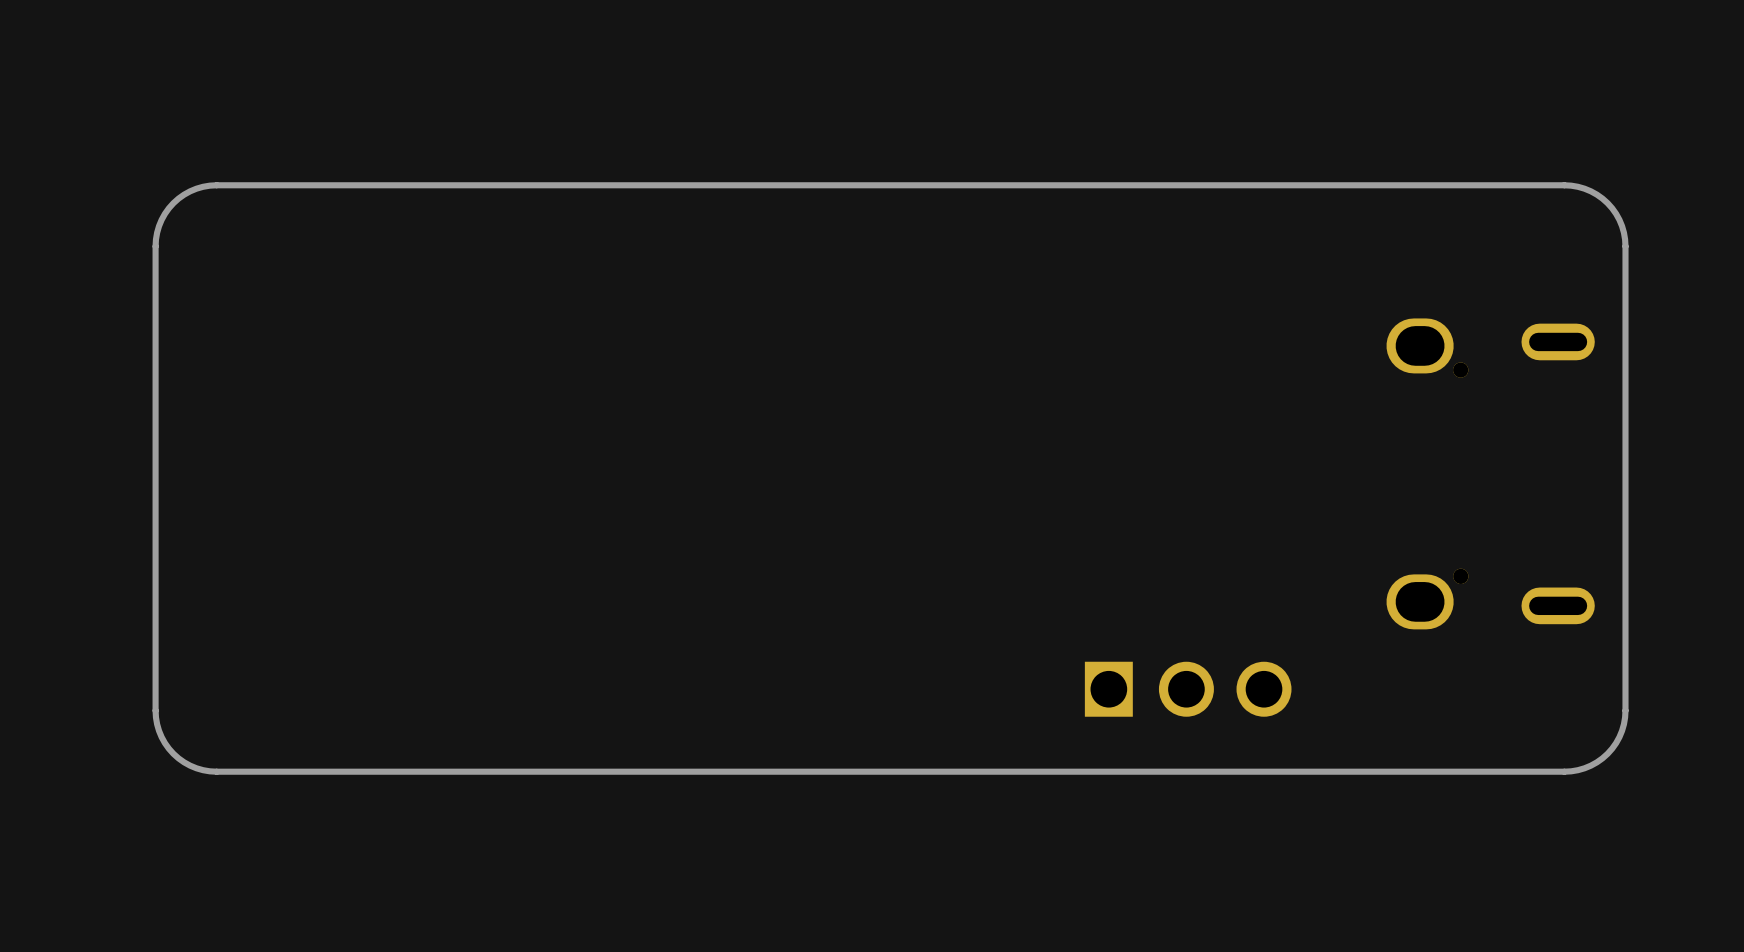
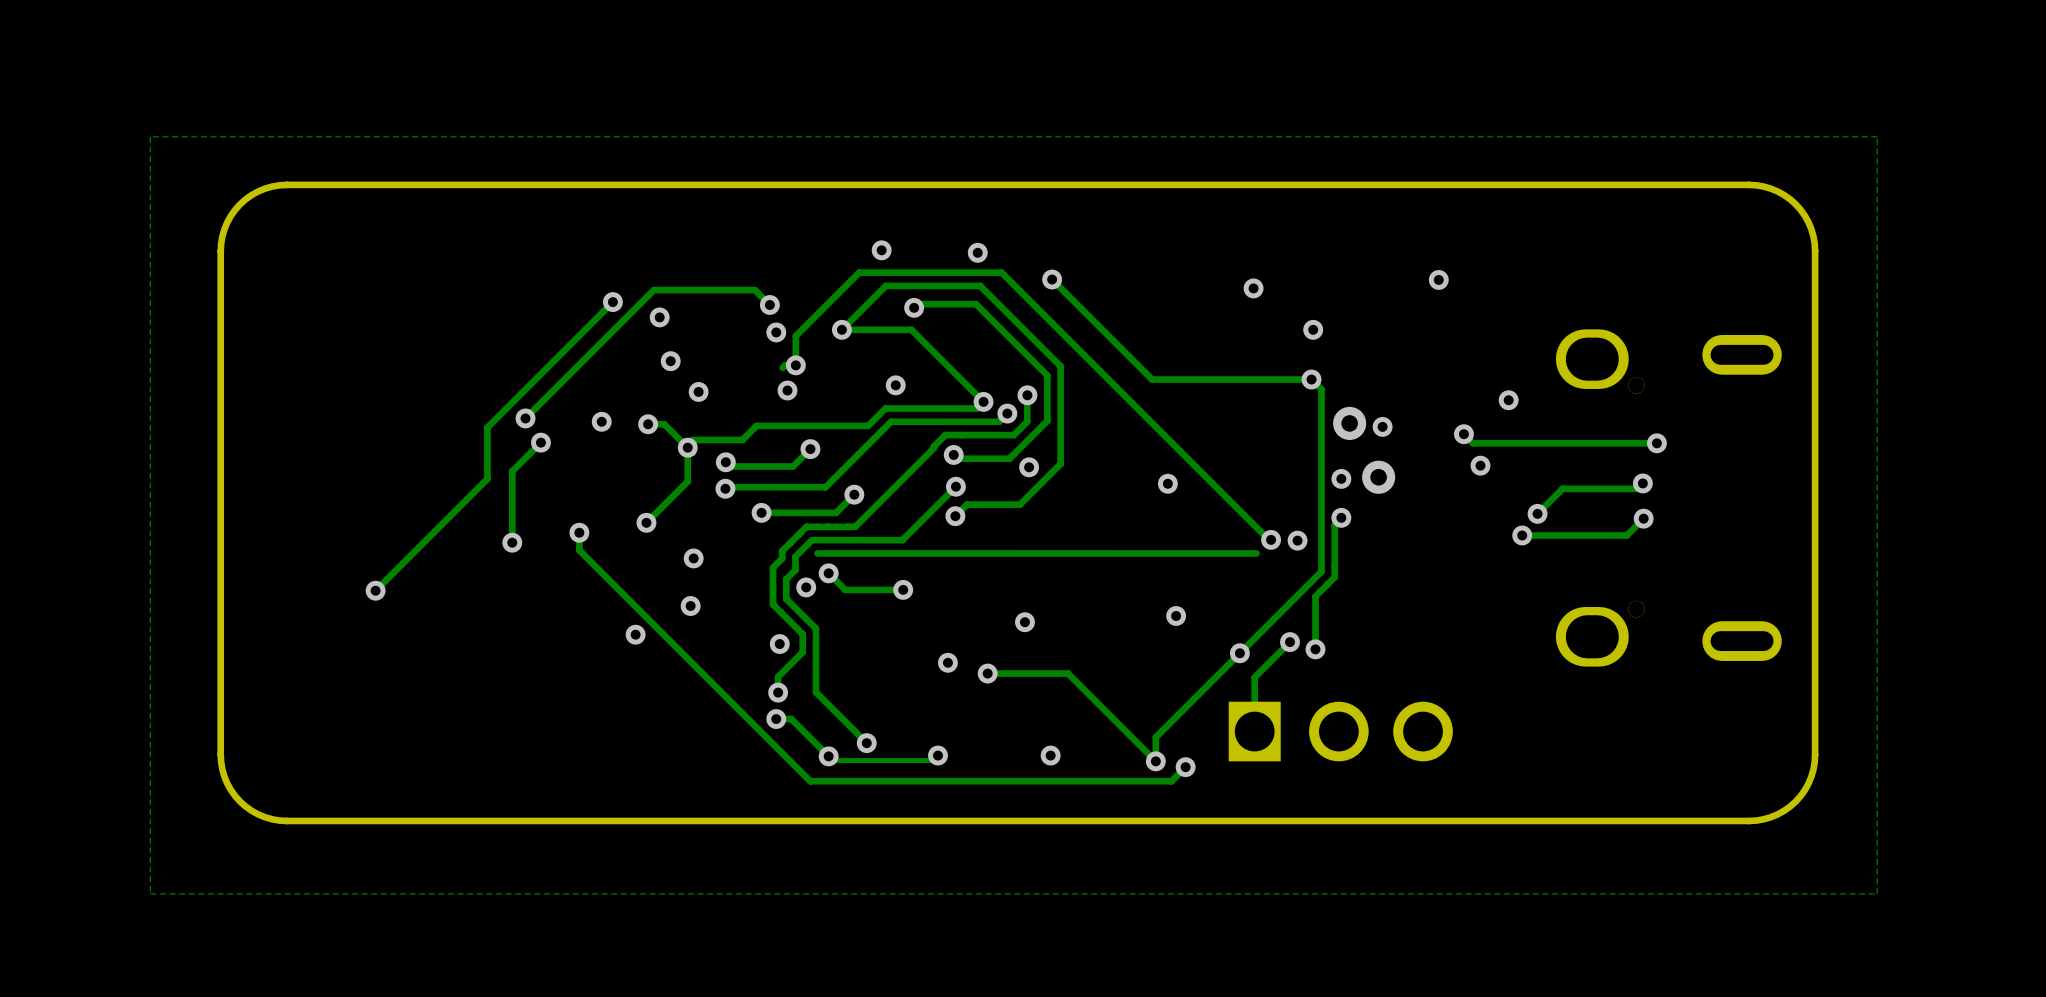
zone outline: none -> (1877, 136) (150, 136) (150, 893) (1877, 893) (1877, 136)
via: none -> (881, 250)
via: none -> (977, 252)
track: none -> (1052, 279) (1152, 379) (1311, 379) (1321, 389) (1321, 571) (1155, 737) (1155, 761) (1068, 673) (987, 673)
via: none -> (1052, 279)
via: none -> (1438, 279)
via: none -> (1253, 288)
track: none -> (612, 302) (487, 427) (487, 478) (375, 590)
via: none -> (612, 302)
track: none -> (769, 304) (755, 290) (653, 290) (525, 418)
via: none -> (769, 304)
track: none -> (913, 304) (975, 304) (1047, 375) (1047, 420) (1009, 458) (957, 458) (953, 454)
via: none -> (914, 307)
via: none -> (659, 317)
via: none -> (841, 329)
via: none -> (1313, 329)
via: none -> (776, 332)
via: none -> (670, 361)
via: none -> (795, 365)
track: none -> (782, 367) (785, 365) (795, 365) (795, 335) (859, 272) (1001, 272) (1271, 539)
via: none -> (1311, 379)
via: none -> (895, 385)
via: none -> (787, 390)
via: none -> (698, 391)
track: none -> (1027, 395) (1027, 421) (1013, 435) (945, 435) (855, 526) (806, 526) (782, 551) (782, 558) (773, 567) (773, 604) (802, 634) (802, 652) (778, 676) (778, 692)
via: none -> (1027, 395)
via: none -> (1508, 400)
via: none -> (983, 401)
track: none -> (1007, 413) (999, 421) (891, 421) (825, 487) (725, 488)
via: none -> (1007, 413)
via: none -> (525, 418)
via: none -> (601, 421)
track: none -> (648, 424) (664, 424) (692, 452) (692, 439) (742, 439) (756, 425) (868, 425) (885, 408) (976, 408) (983, 401) (911, 329) (841, 329) (885, 285) (980, 285) (1060, 366) (1060, 463) (1019, 504) (966, 504) (955, 516)
via: none -> (648, 424)
via: none -> (1349, 423)
via: none -> (1382, 426)
track: none -> (1463, 434) (1473, 443) (1656, 443)
via: none -> (1463, 434)
track: none -> (540, 442) (512, 471) (512, 542)
via: none -> (540, 442)
via: none -> (1656, 443)
track: none -> (687, 447) (687, 481) (646, 522)
via: none -> (687, 447)
track: none -> (810, 449) (793, 466) (731, 466) (725, 462)
via: none -> (810, 449)
via: none -> (953, 454)
via: none -> (725, 462)
via: none -> (1480, 465)
via: none -> (1029, 467)
via: none -> (1378, 477)
via: none -> (1341, 478)
via: none -> (1167, 483)
track: none -> (1642, 483) (1637, 488) (1562, 488) (1537, 513)
via: none -> (1642, 483)
track: none -> (955, 486) (902, 540) (812, 540) (795, 556) (795, 570) (786, 579) (786, 598) (816, 628) (816, 692) (866, 743)
via: none -> (955, 486)
via: none -> (725, 488)
track: none -> (854, 494) (836, 512) (761, 512)
via: none -> (854, 494)
via: none -> (761, 512)
via: none -> (1537, 513)
via: none -> (955, 516)
track: none -> (1341, 517) (1334, 525) (1334, 577) (1315, 596) (1315, 649)
via: none -> (1341, 517)
track: none -> (1643, 518) (1626, 535) (1522, 535)
via: none -> (1643, 518)
via: none -> (646, 522)
track: none -> (579, 532) (579, 550) (810, 781) (1171, 781) (1185, 767)
via: none -> (579, 532)
via: none -> (1522, 535)
via: none -> (1271, 539)
via: none -> (1297, 540)
via: none -> (512, 542)
track: none -> (1256, 553) (817, 553)
via: none -> (693, 558)
track: none -> (828, 573) (845, 589) (903, 589)
via: none -> (828, 573)
via: none -> (806, 587)
via: none -> (903, 589)
via: none -> (375, 590)
via: none -> (690, 606)
via: none -> (1176, 615)
via: none -> (1024, 622)
via: none -> (635, 634)
track: none -> (1290, 642) (1254, 677) (1254, 731)
via: none -> (1290, 642)
via: none -> (779, 644)
via: none -> (1315, 649)
via: none -> (1239, 653)
via: none -> (947, 662)
via: none -> (987, 673)
via: none -> (778, 692)
track: none -> (776, 719) (791, 719) (832, 760) (932, 760) (938, 755)
via: none -> (776, 719)
via: none -> (866, 743)
via: none -> (938, 755)
via: none -> (1050, 755)
via: none -> (828, 756)
via: none -> (1155, 761)
via: none -> (1185, 767)

